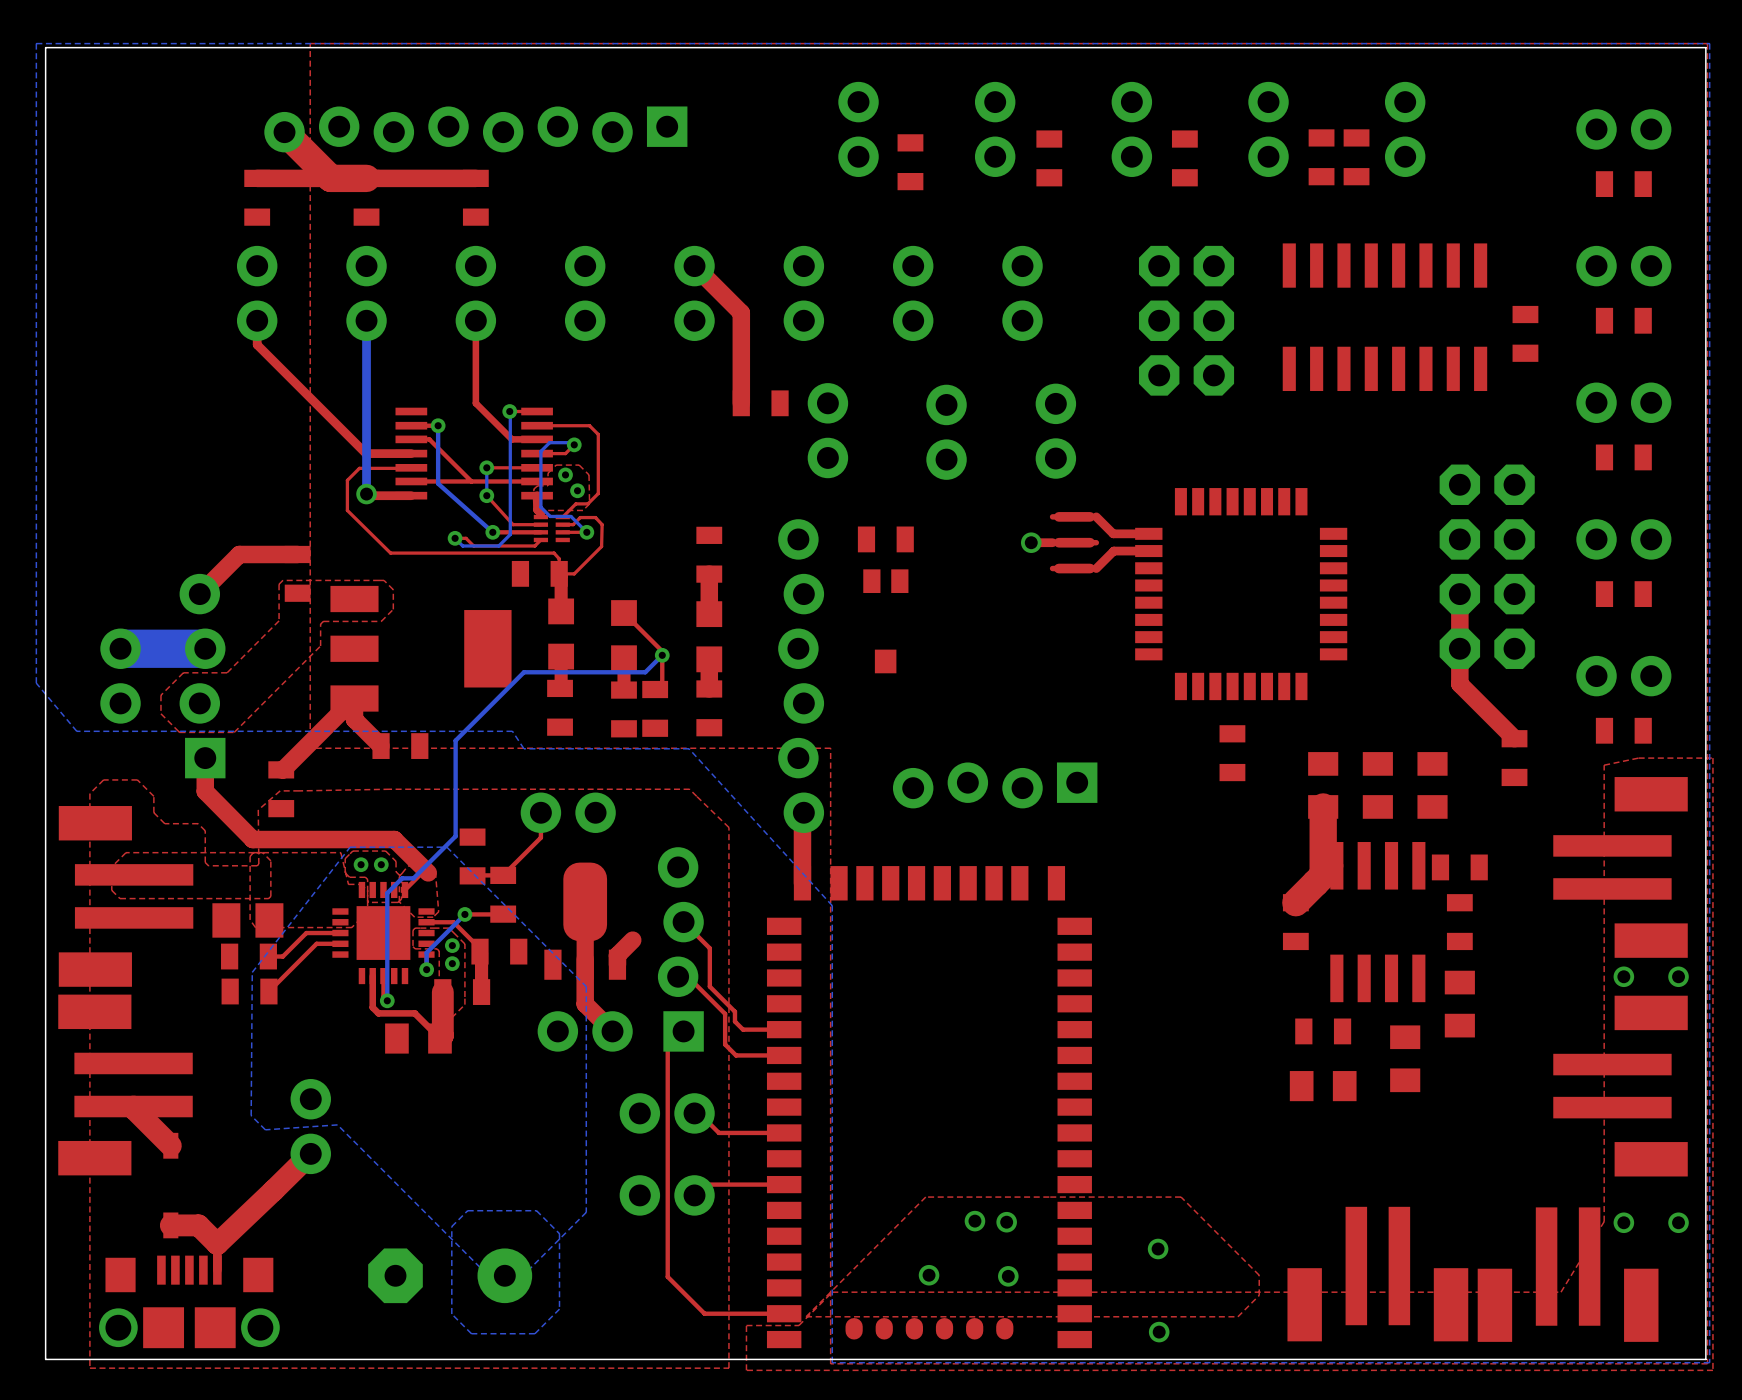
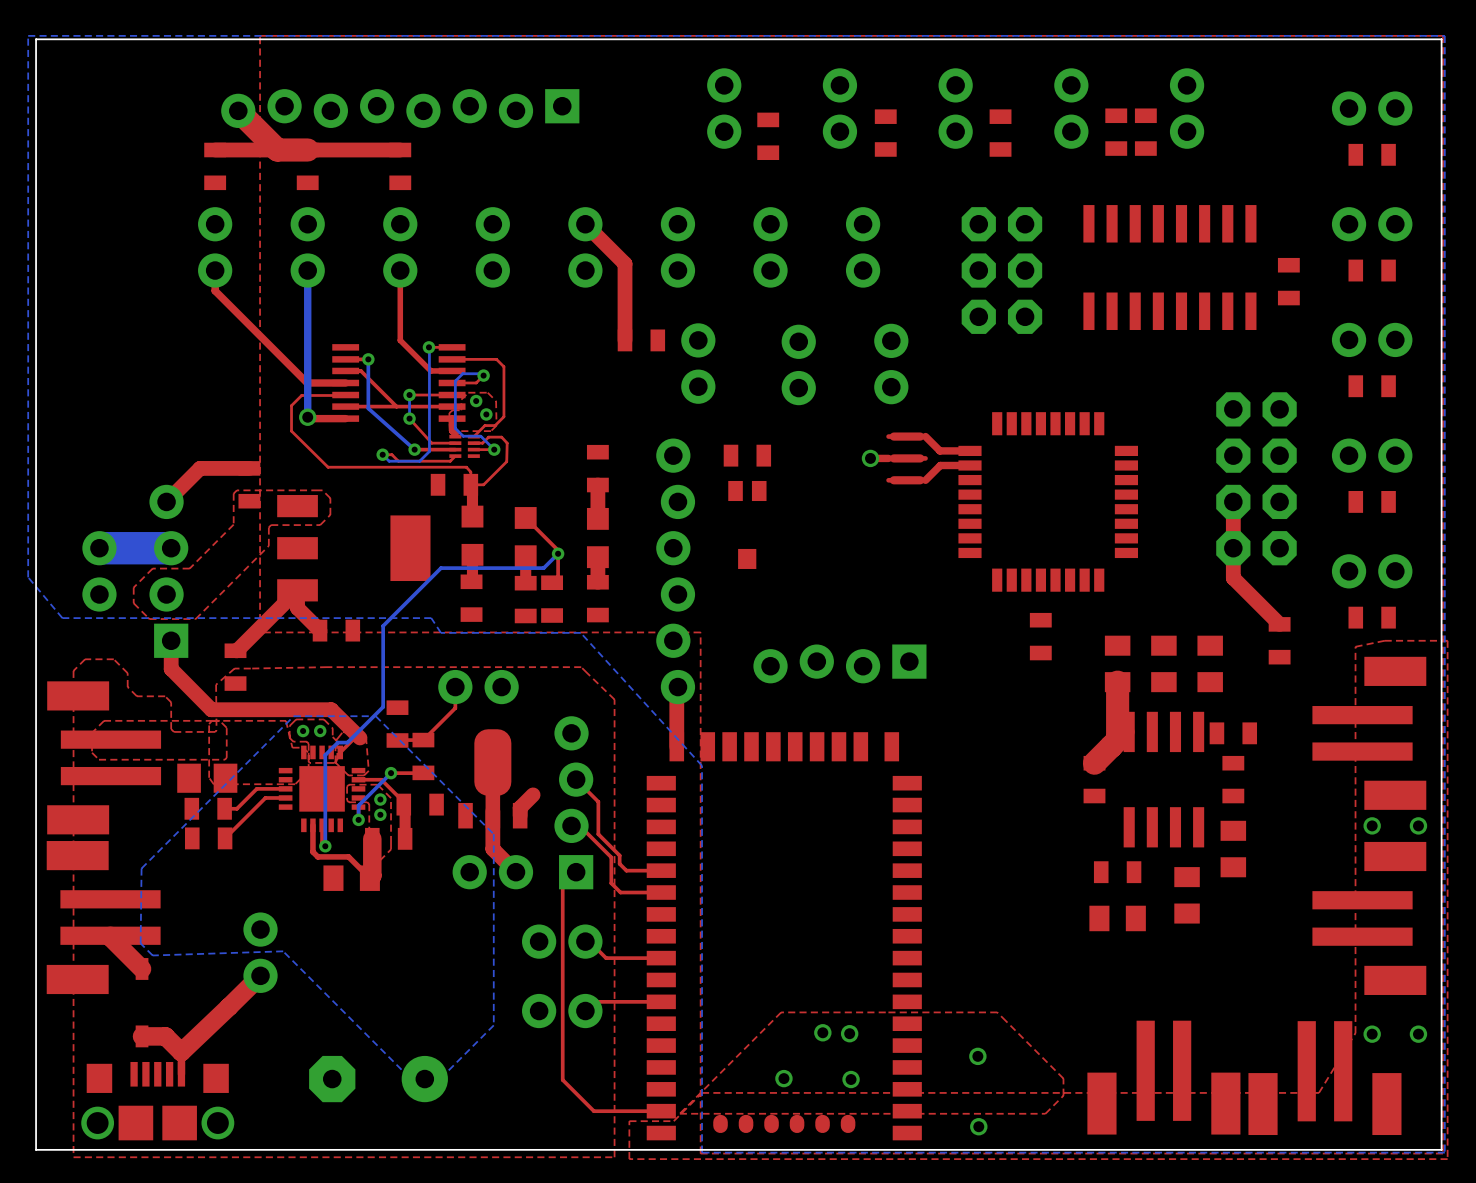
bottom zone outline: (350, 847) (252, 972) (251, 1115) (265, 1129) (337, 1124) -> (293, 716) (141, 868) (140, 943) (152, 955) (283, 951)
bottom zone outline: (536, 1210) (467, 1210) (451, 1226) (451, 1314) (471, 1333) (534, 1333) (559, 1309) (559, 1233) (536, 1210) -> none

